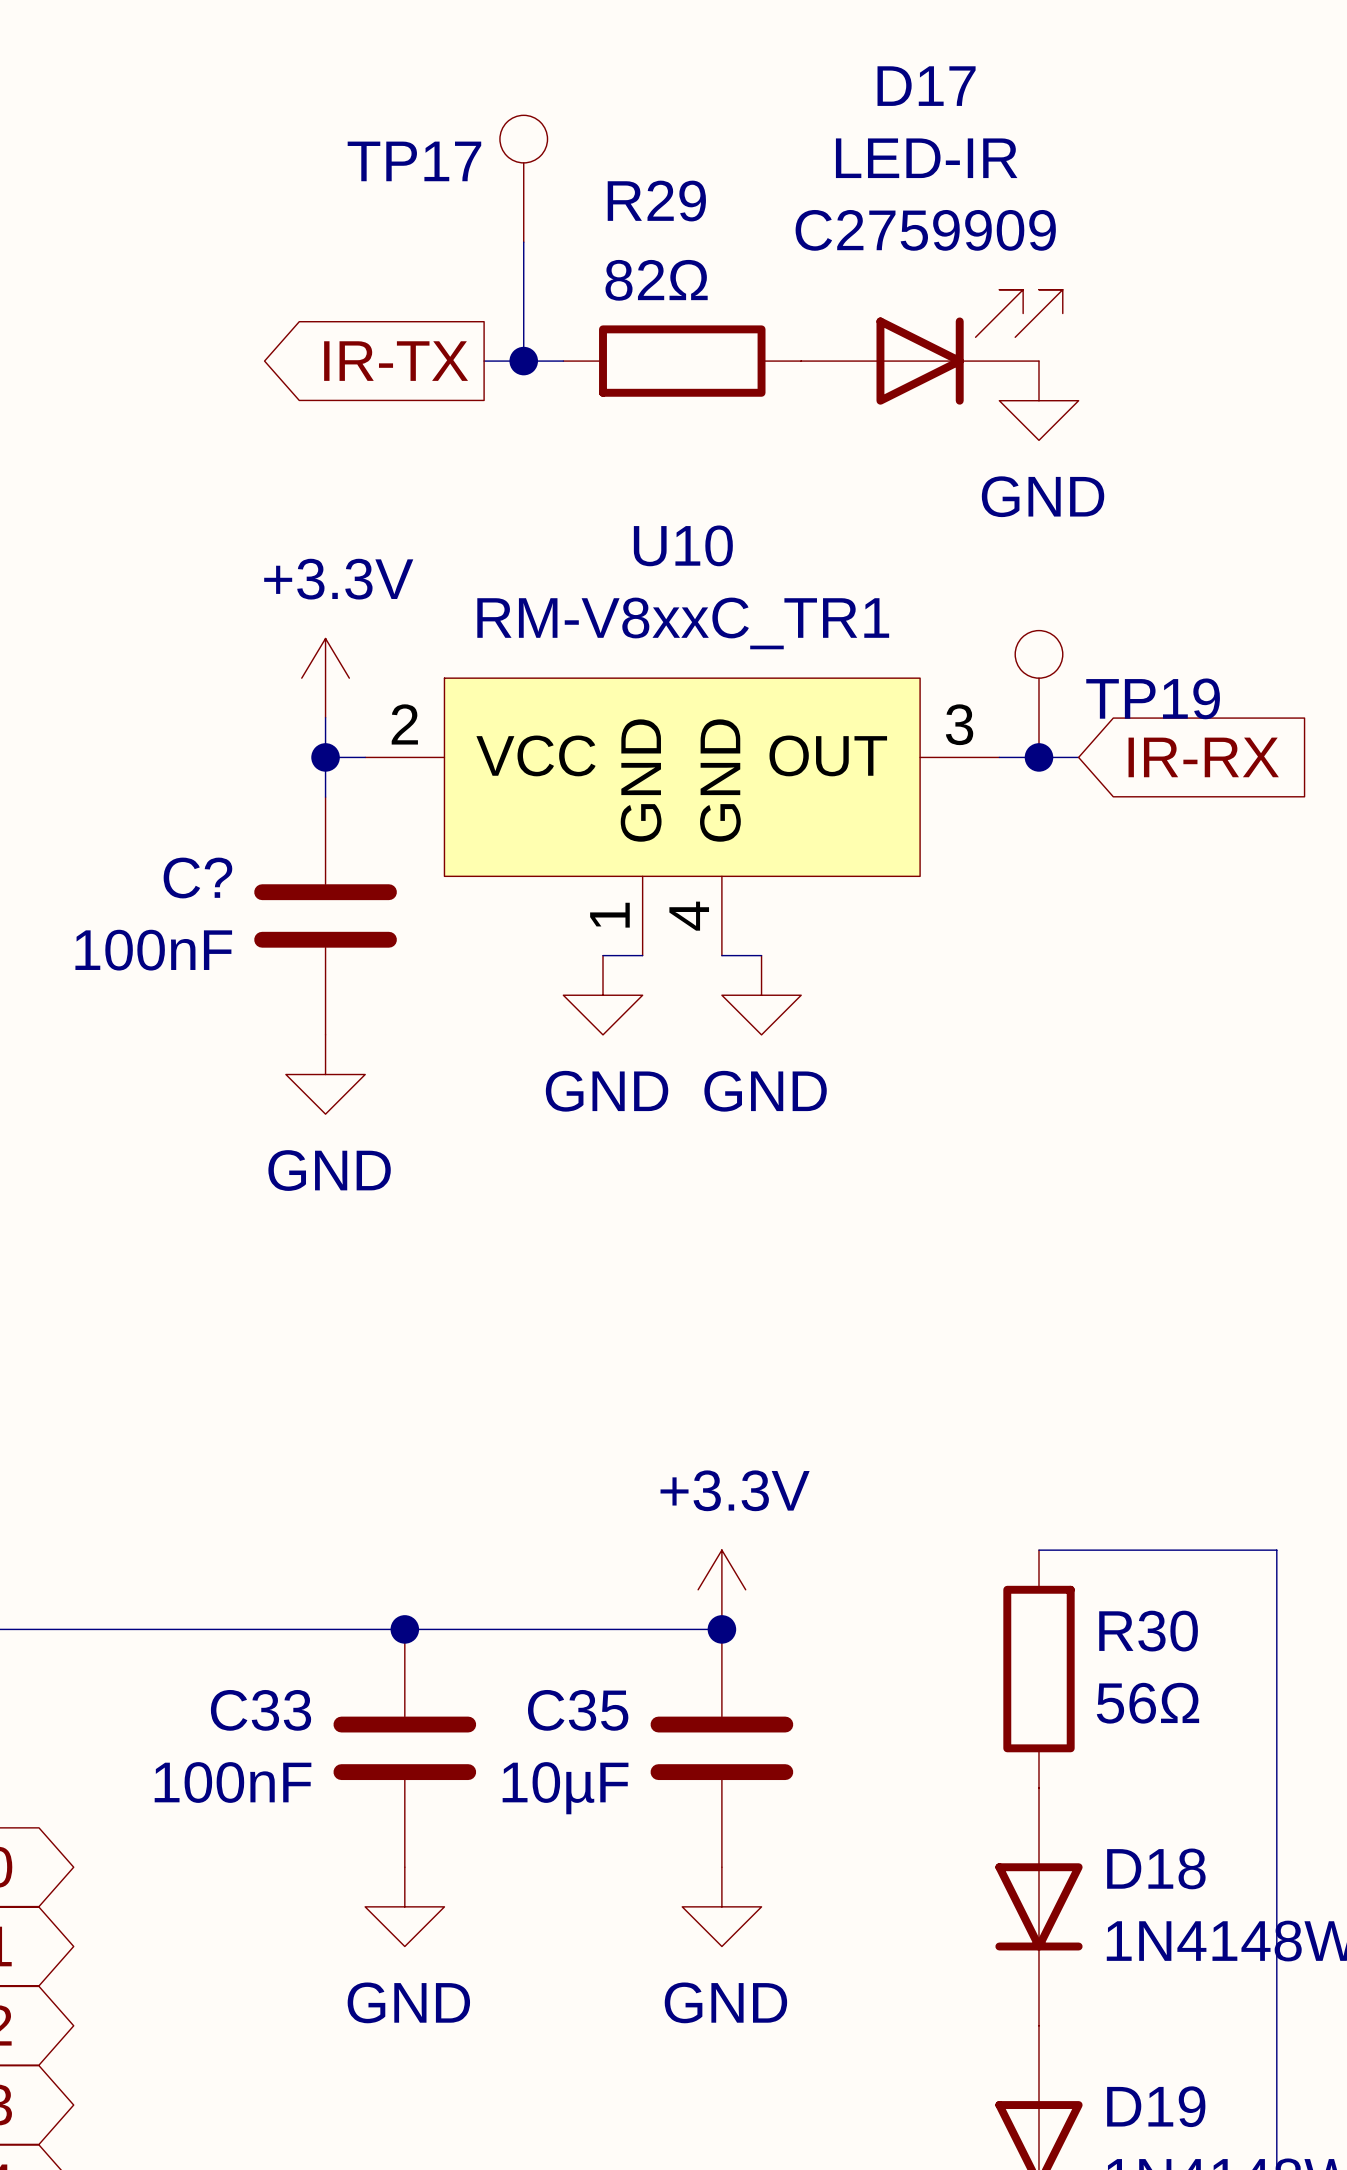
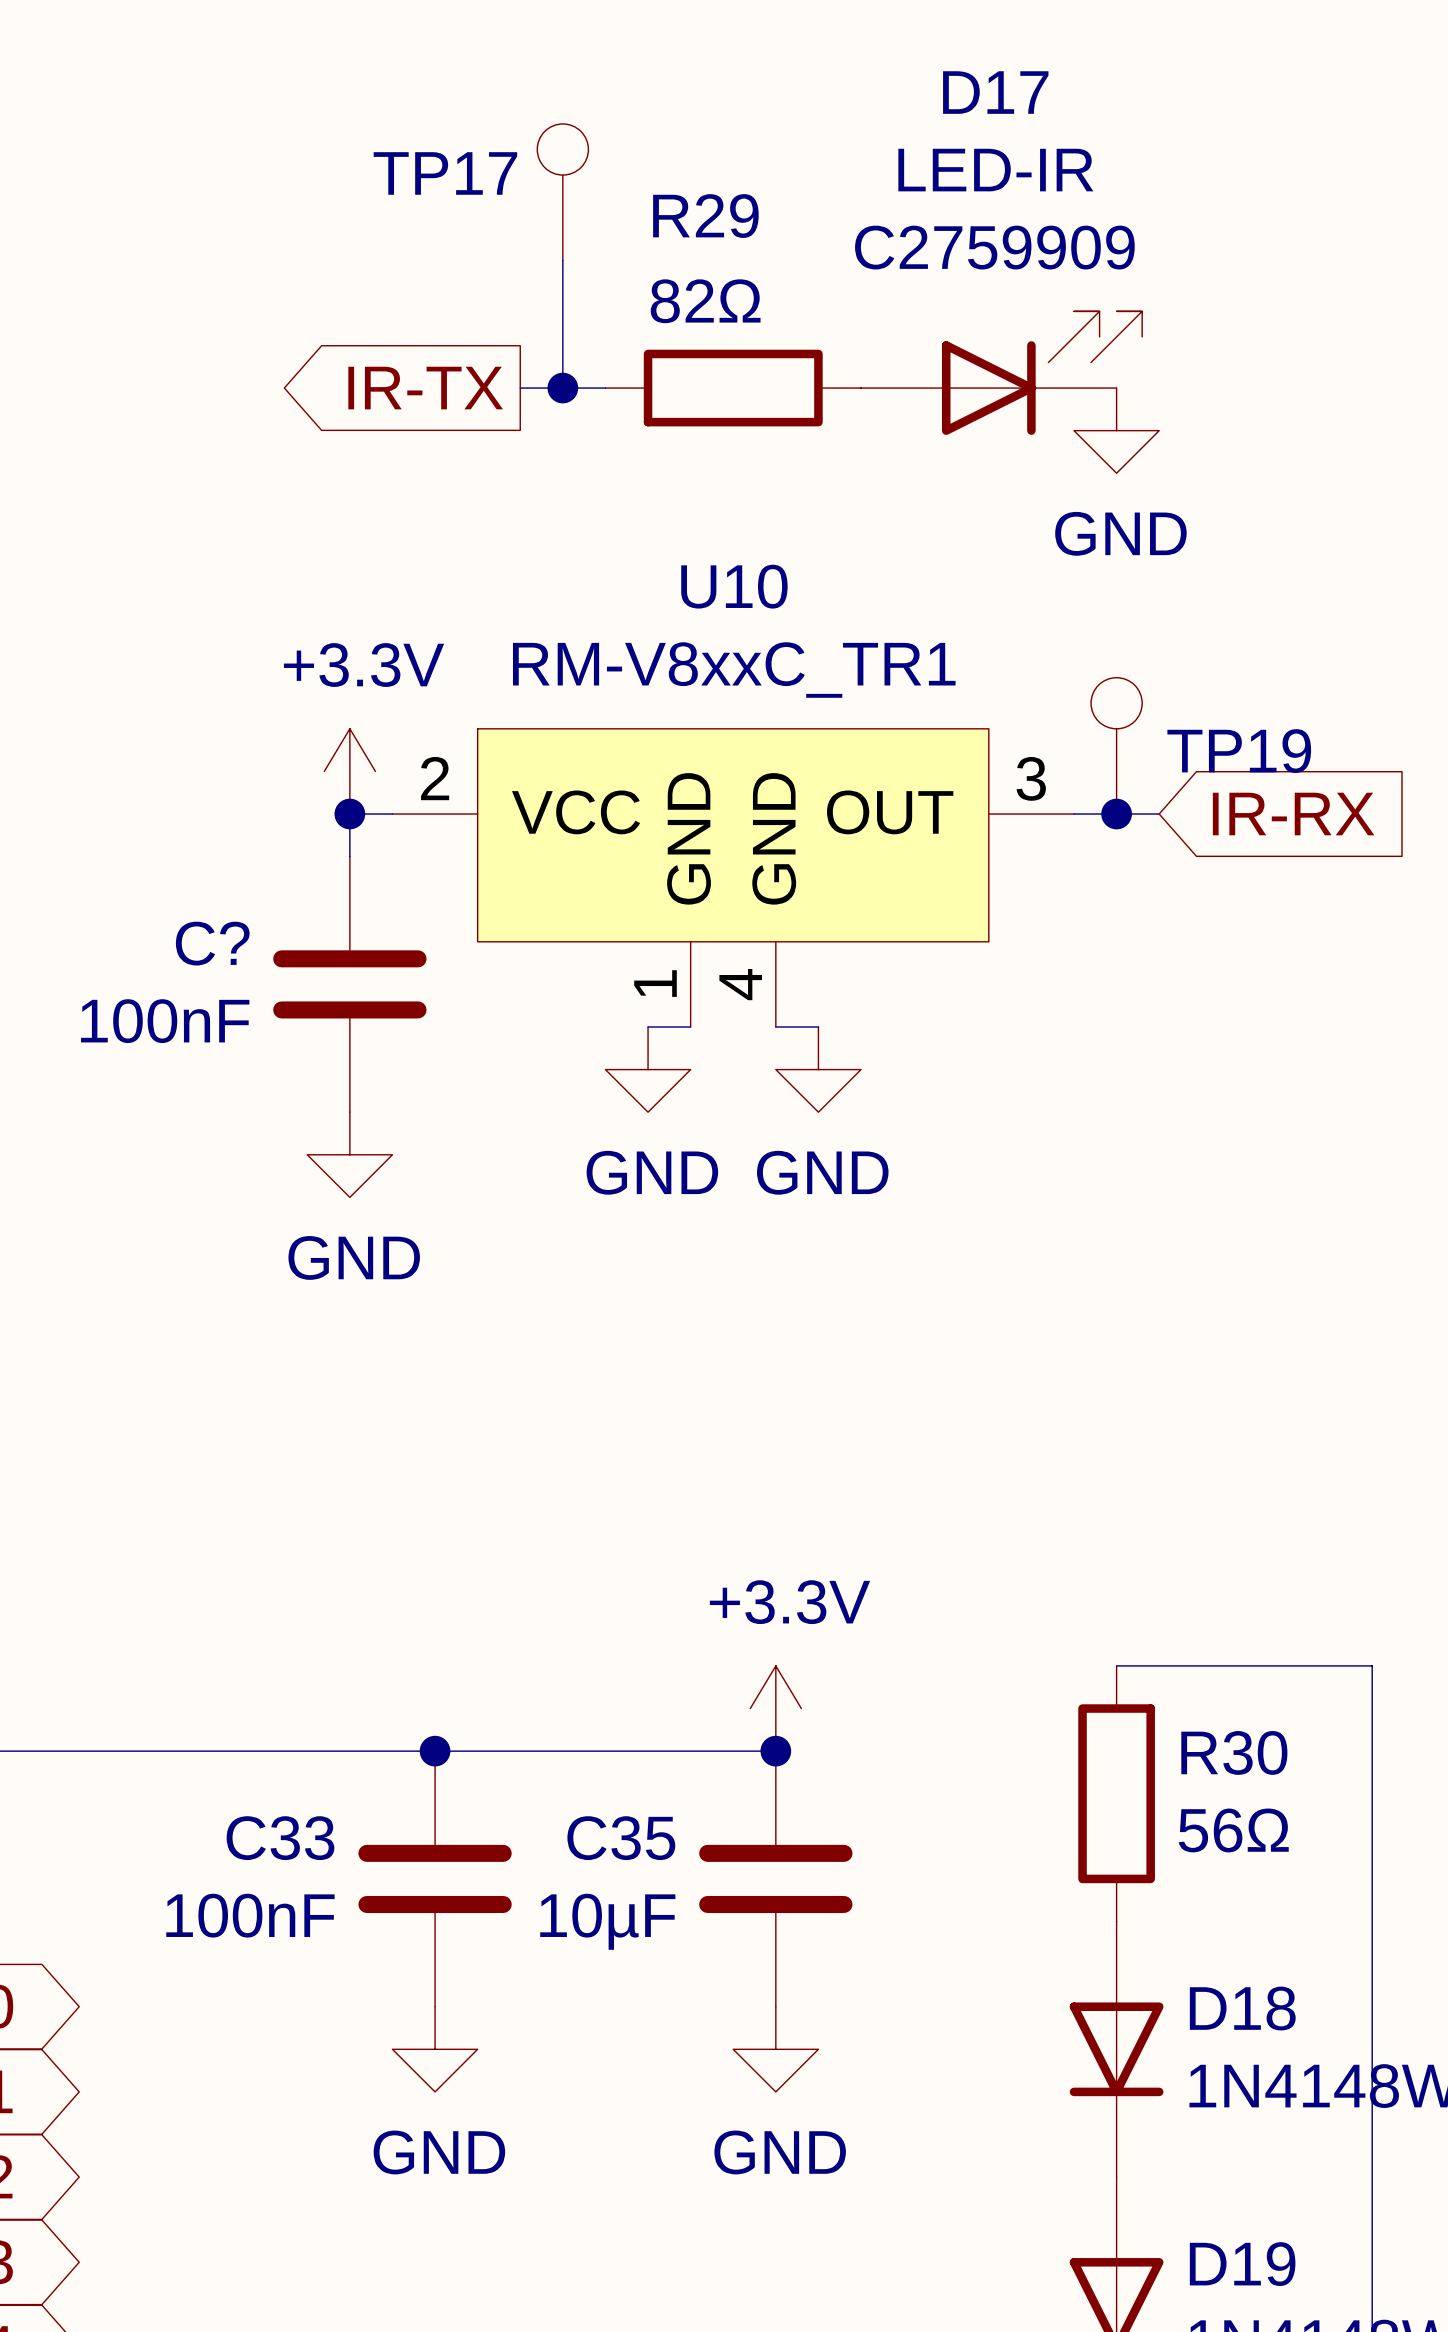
power symbol position: +3.3V (325, 678) -> +3.3V (349, 771)

